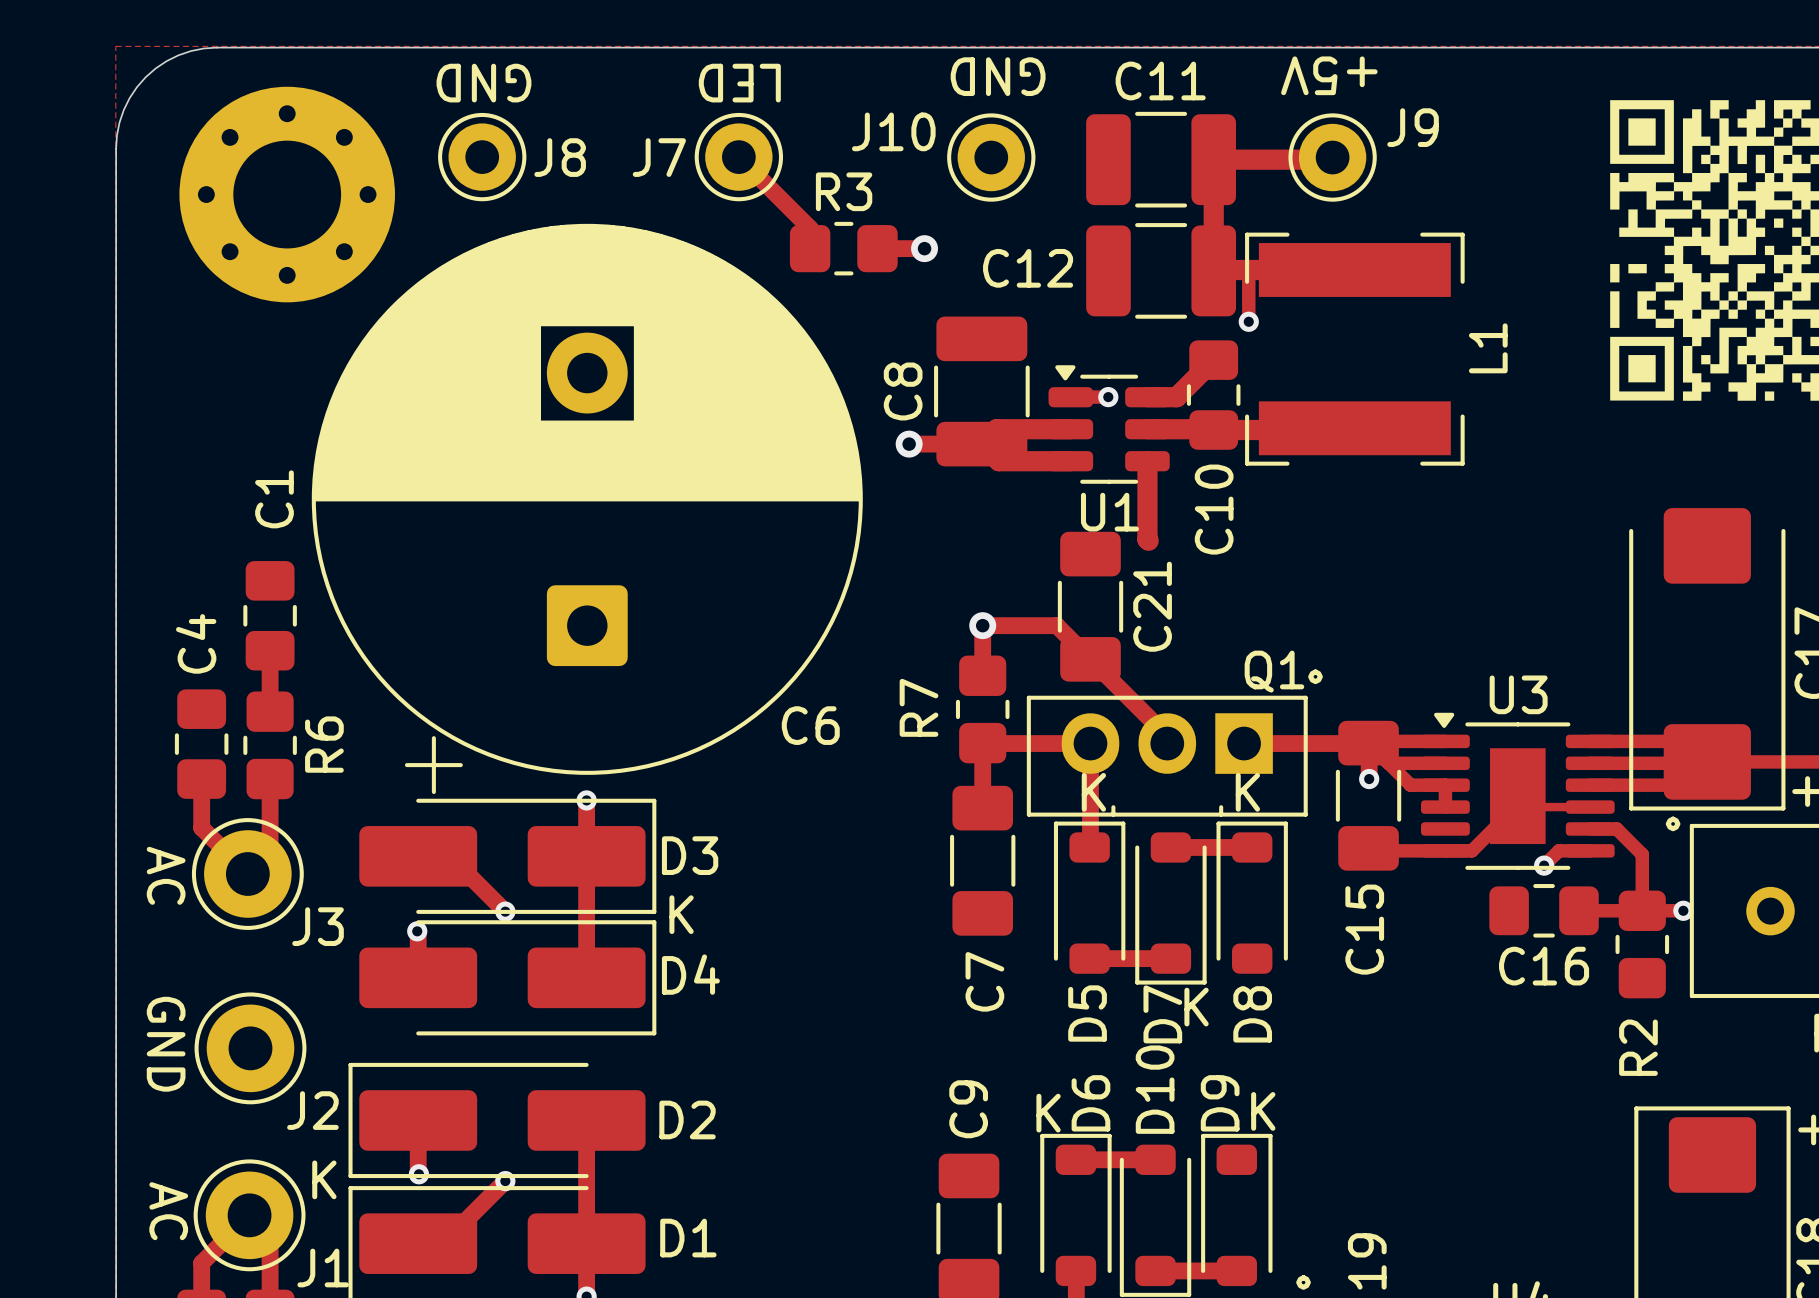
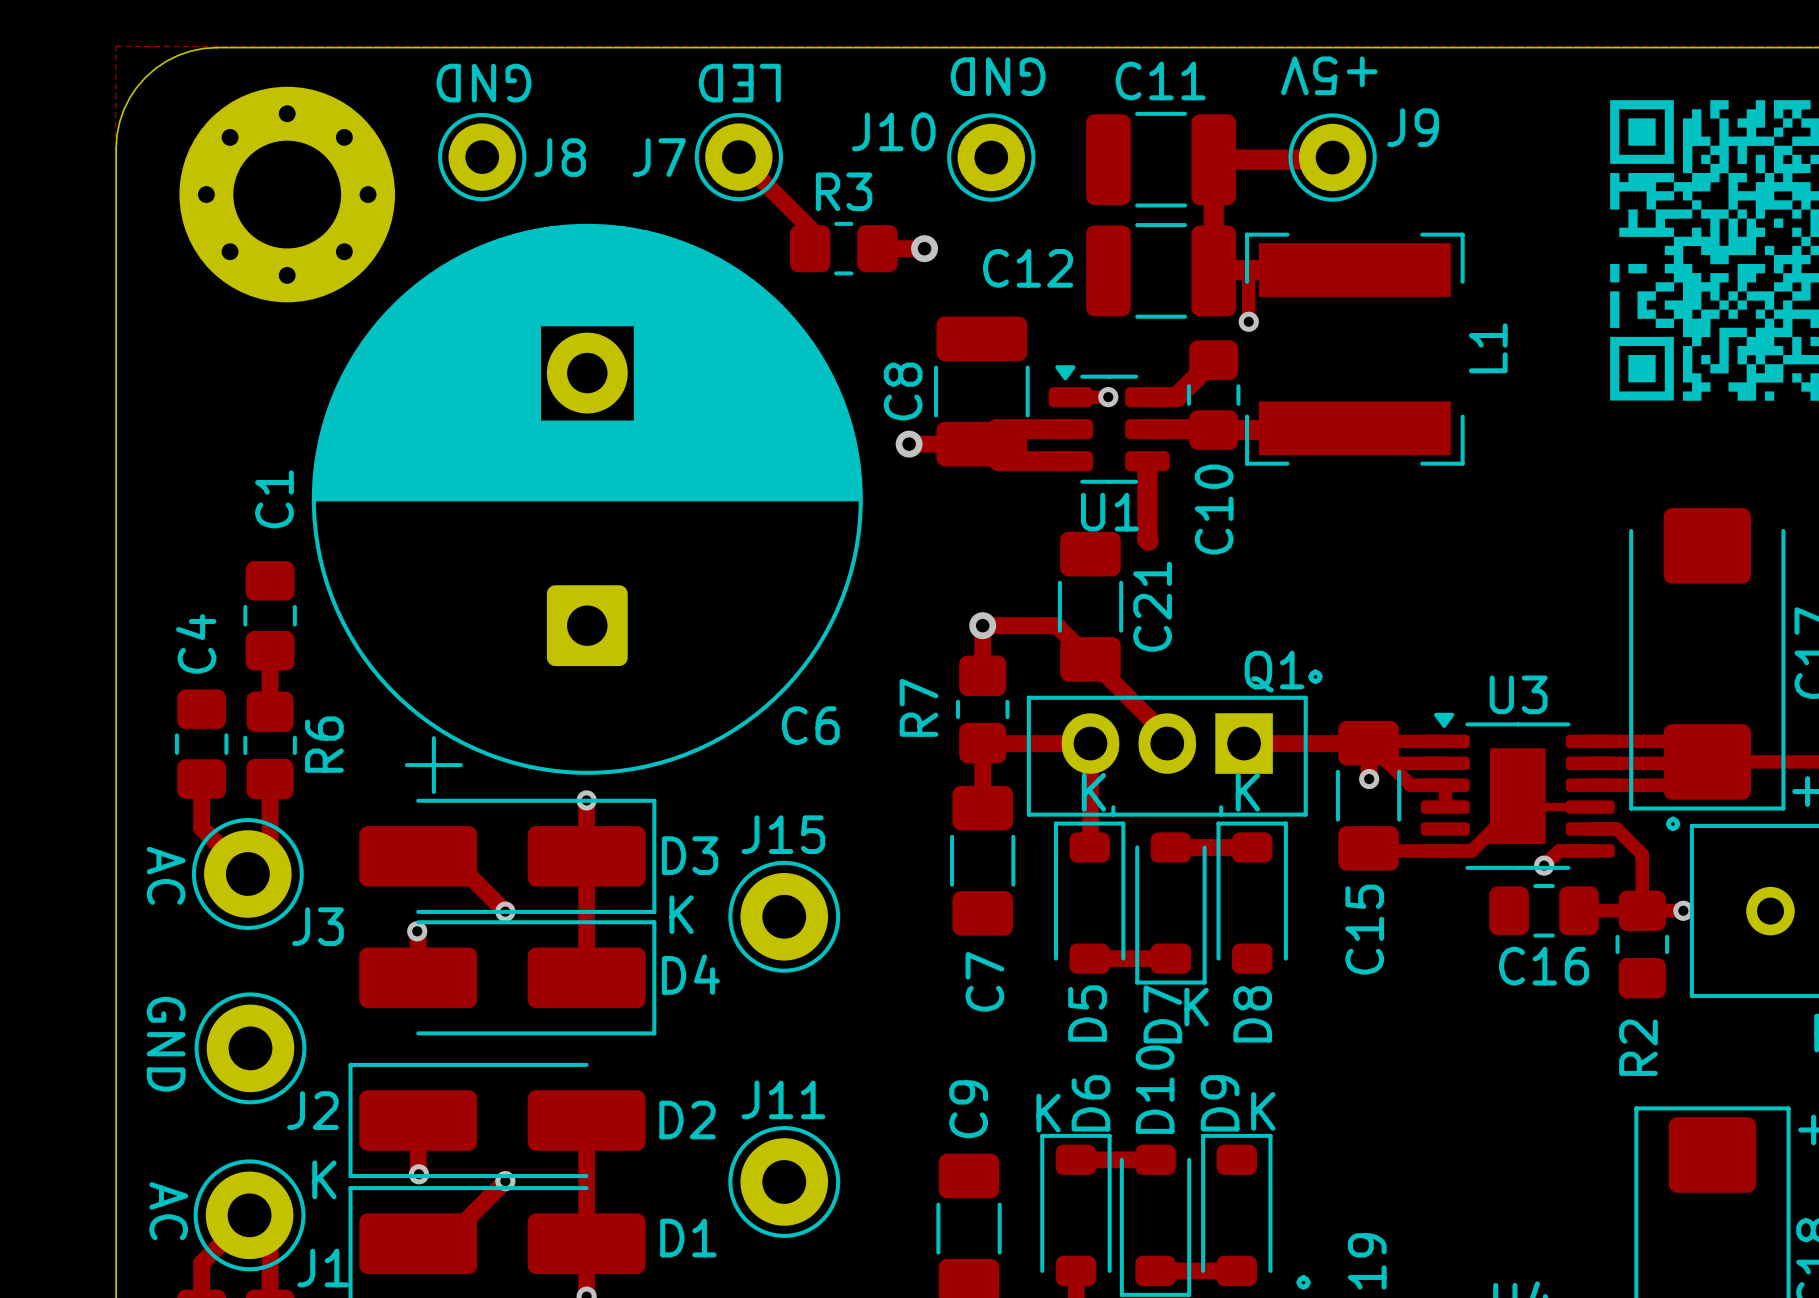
J15: none -> (784, 916)
J11: none -> (784, 1181)

